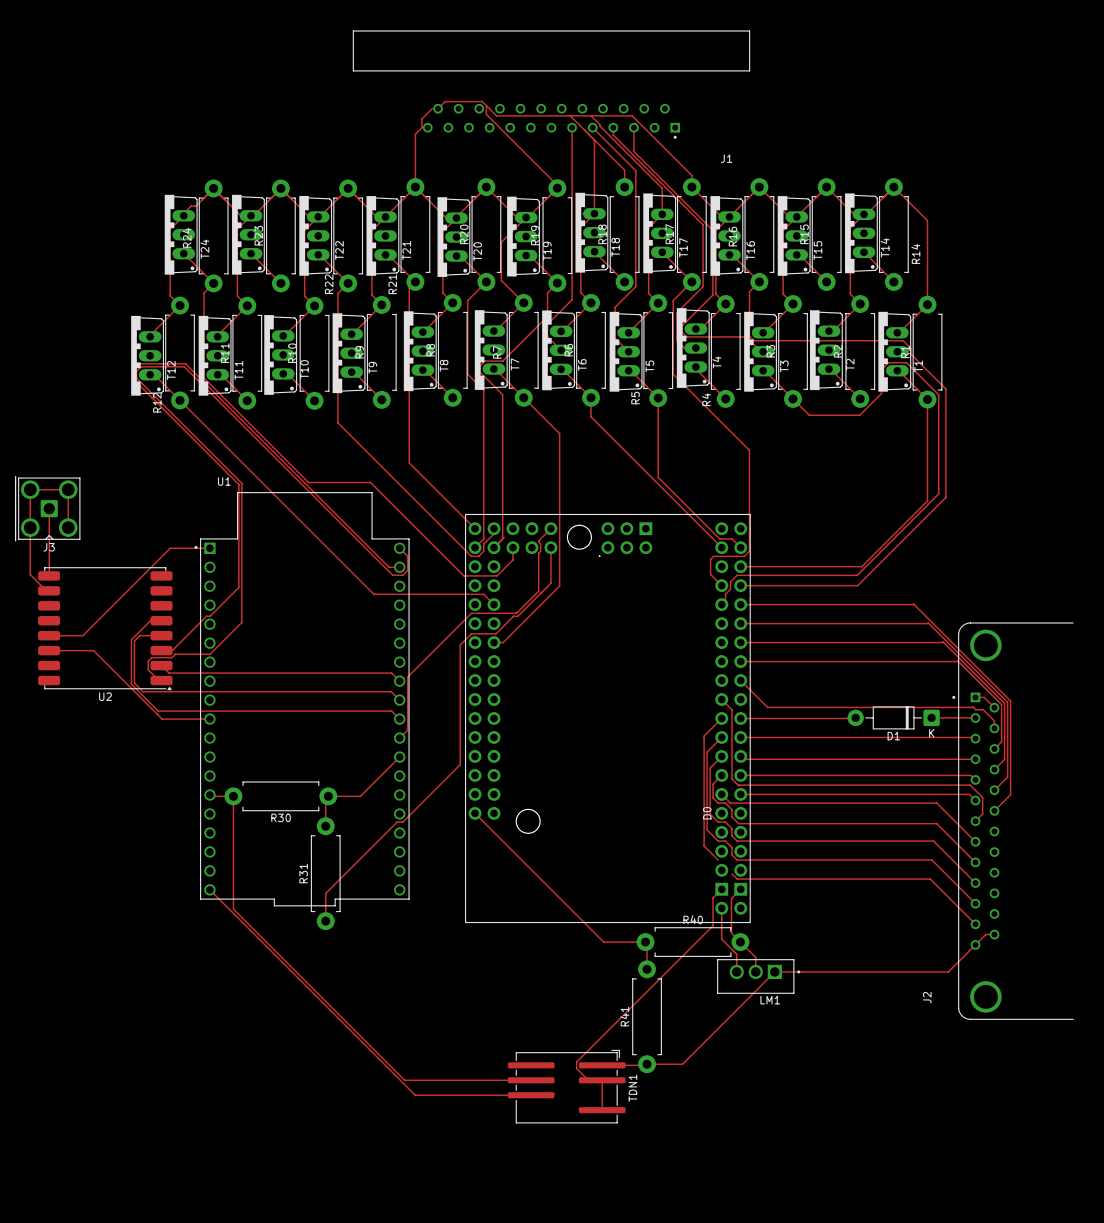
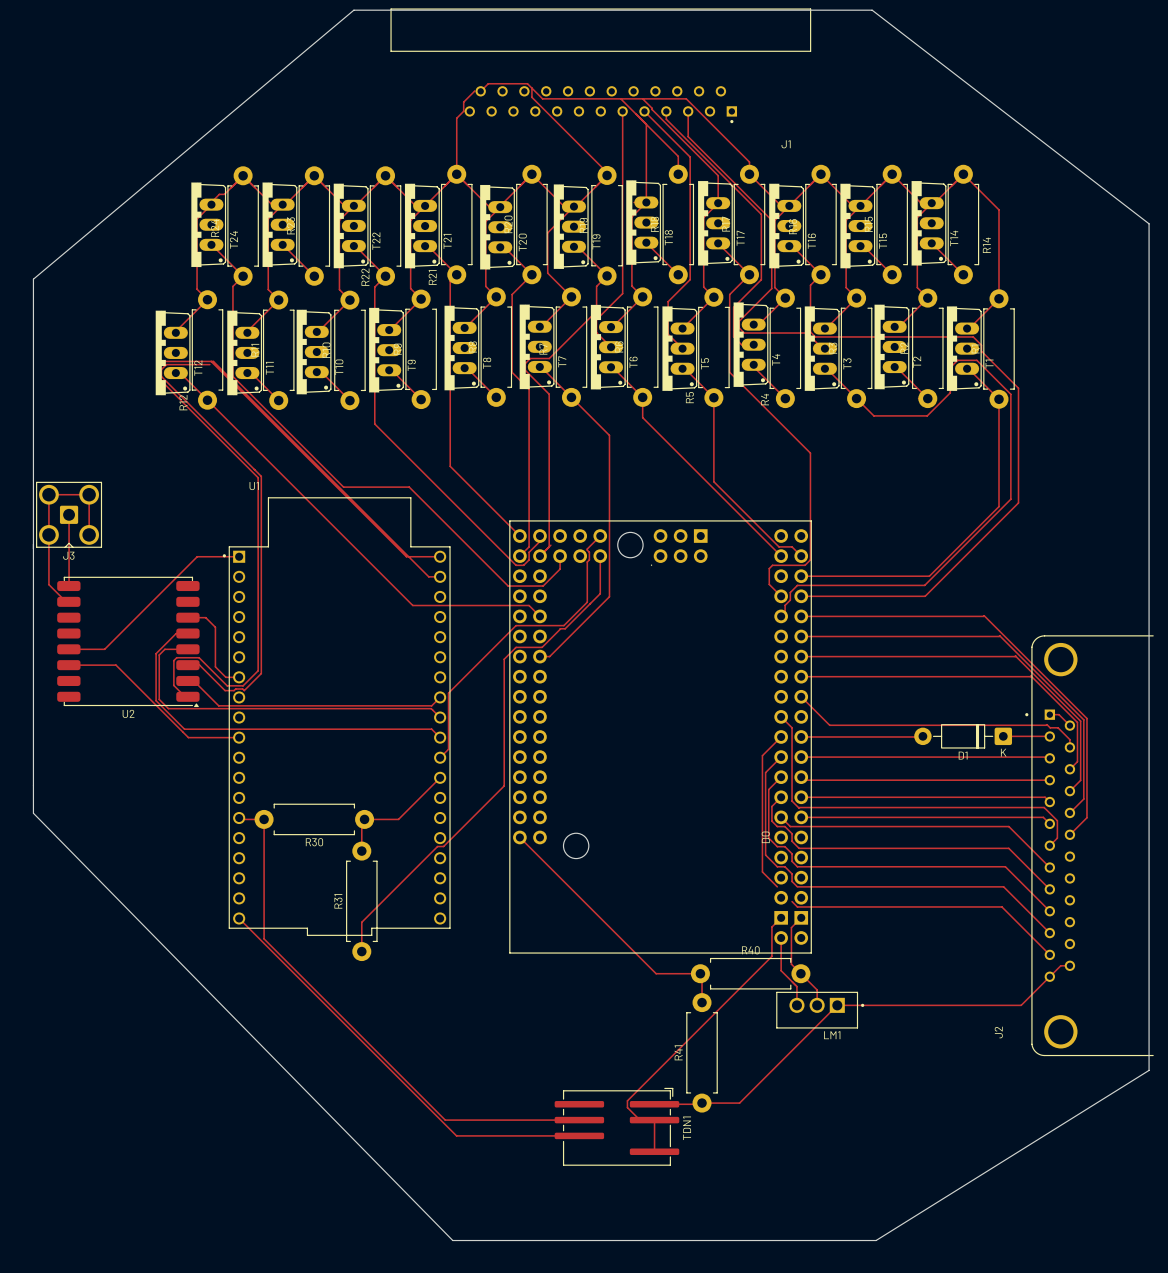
track: (182, 366) (392, 575) (403, 575) (407, 570) (407, 556) (399, 548) -> (211, 361) (406, 556) (440, 556)
track: (224, 465) (241, 483) (241, 622) (210, 654) (174, 654) (172, 657) (151, 657) (148, 661) -> (258, 477) (258, 670) (243, 685) (227, 685) (199, 657) (176, 657) (173, 660) (173, 676)
track: (227, 473) (238, 484) (238, 587) (172, 650) -> (254, 470) (261, 476) (261, 673) (244, 690) (242, 689) (225, 690) (199, 665)
board edge: none -> (33, 480) (33, 279) (353, 10) (872, 10) (1149, 223) (1149, 1070) (876, 1240) (452, 1240) (33, 813) (33, 544)
track: none -> (187, 617) (205, 617) (215, 627) (215, 666) (225, 677) (239, 677)
track: (163, 667) (169, 673) (391, 673) (399, 681) -> (189, 682) (195, 682) (218, 705) (431, 705) (440, 697)

